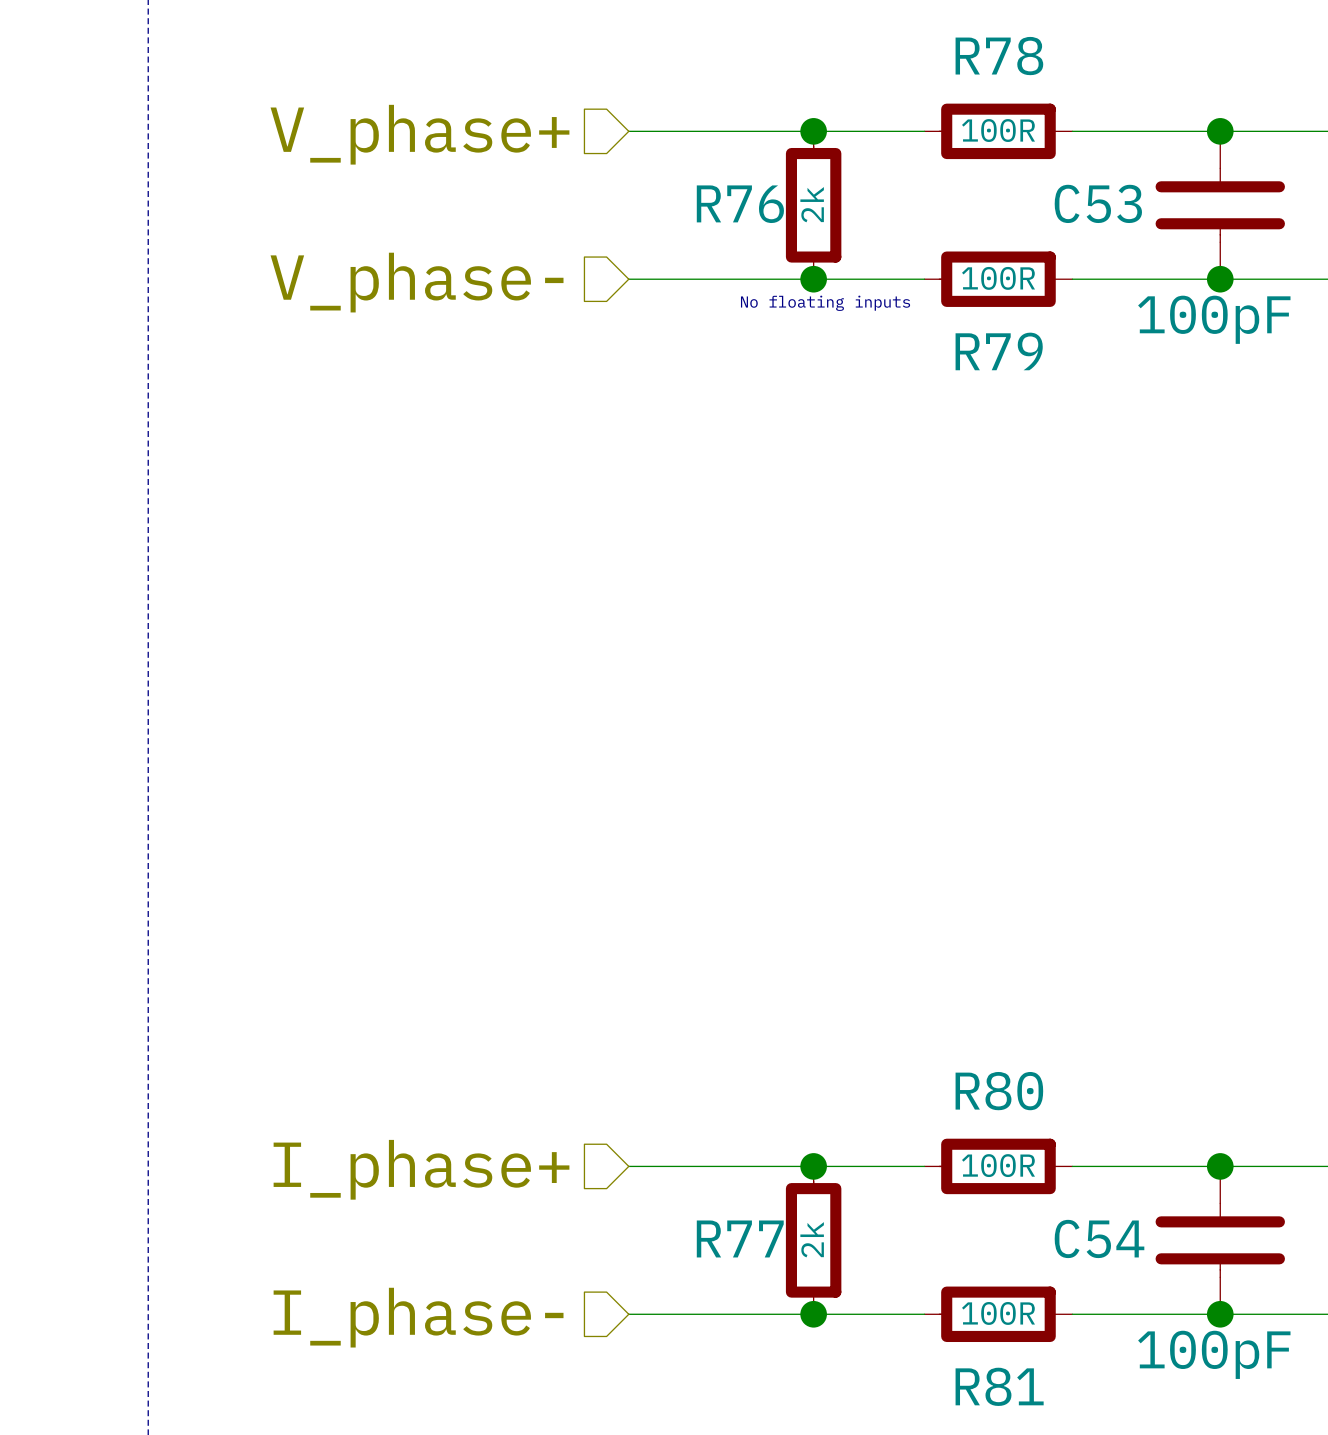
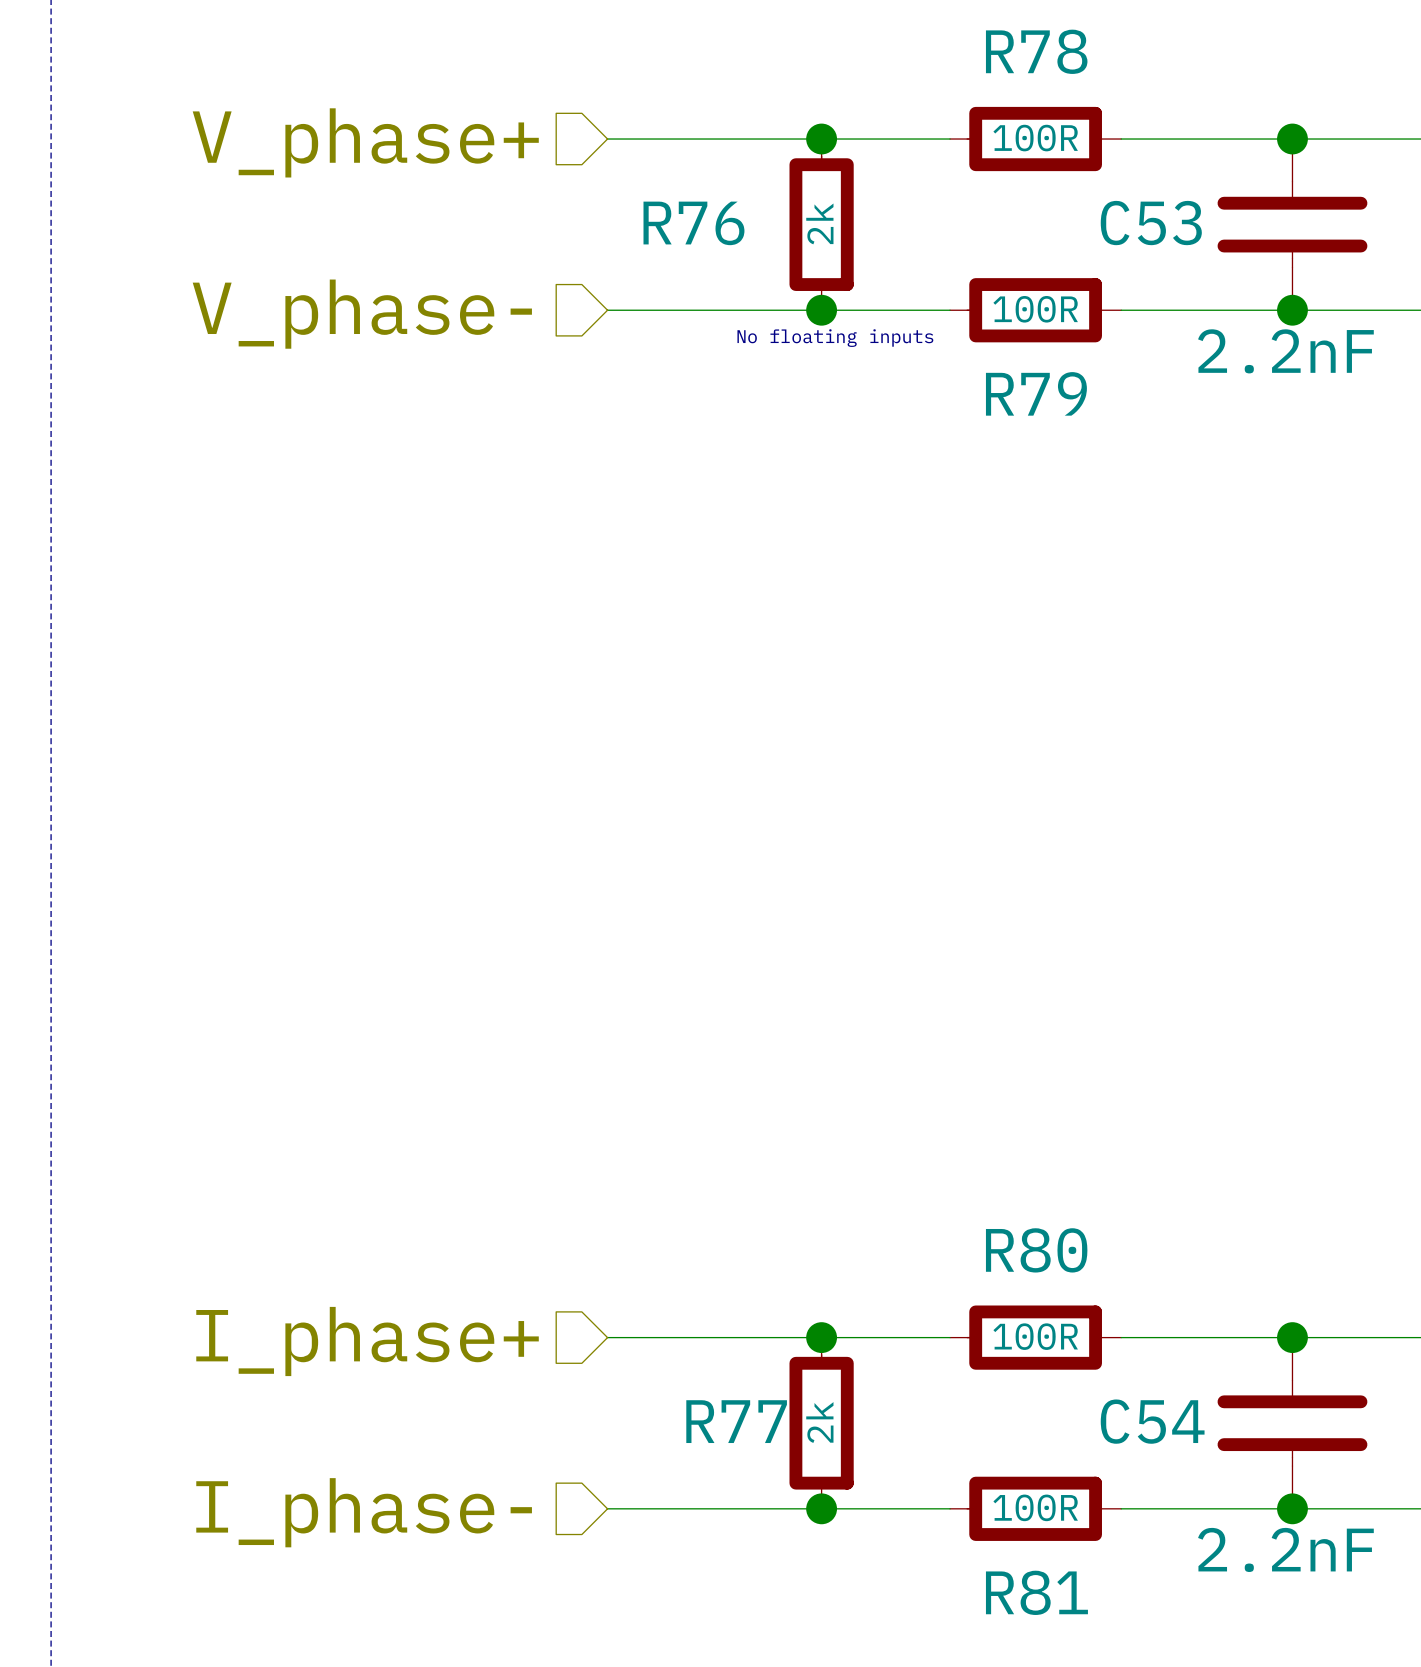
R76 name position: R76 (740, 204) -> R76 (693, 223)
C53 value: 100pF (1214, 319) -> 2.2nF (1285, 351)
C54 value: 100pF (1214, 1354) -> 2.2nF (1285, 1549)

